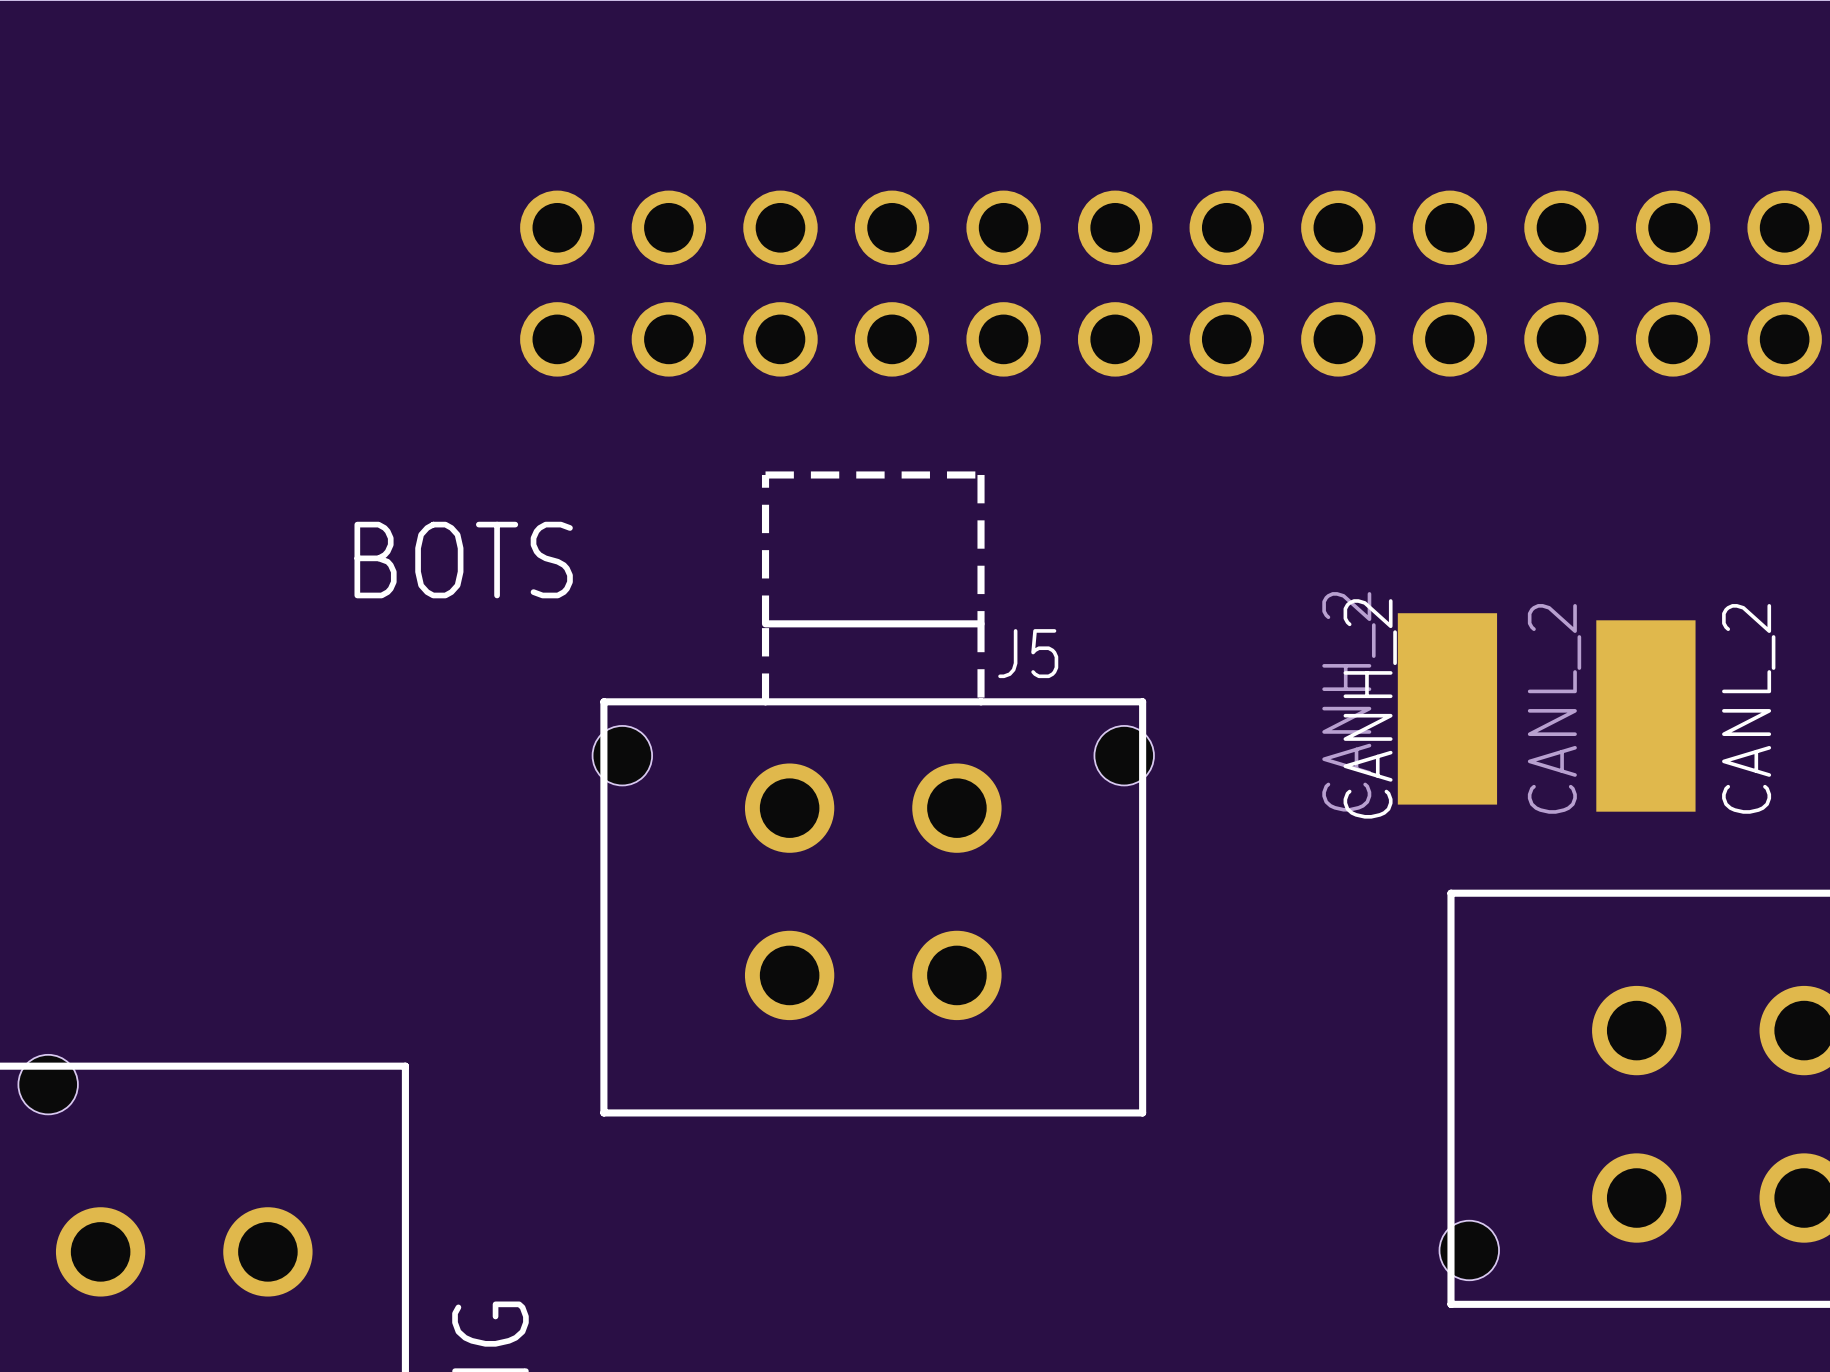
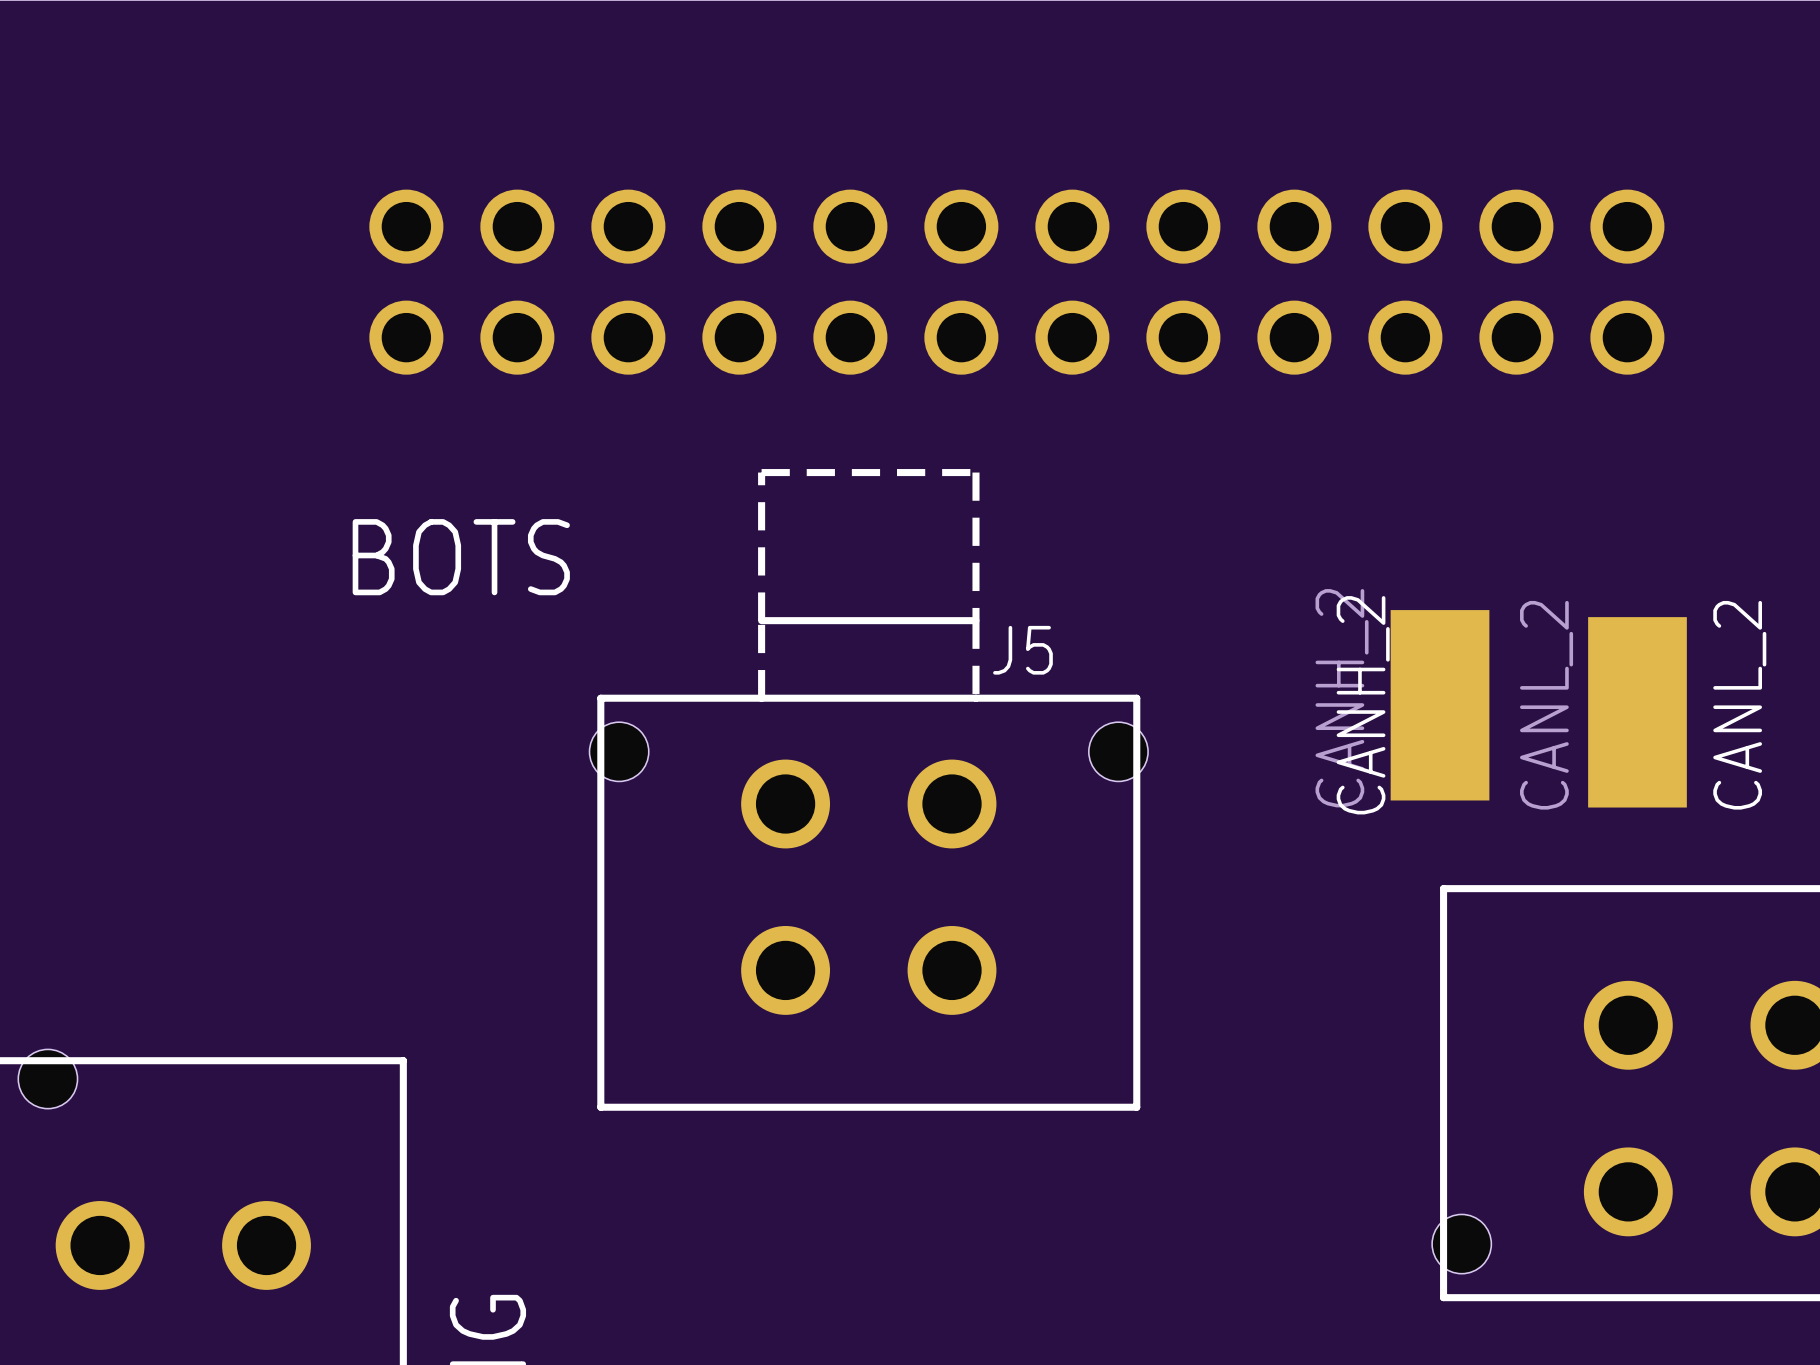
part position: (1170, 283) -> (1016, 282)

